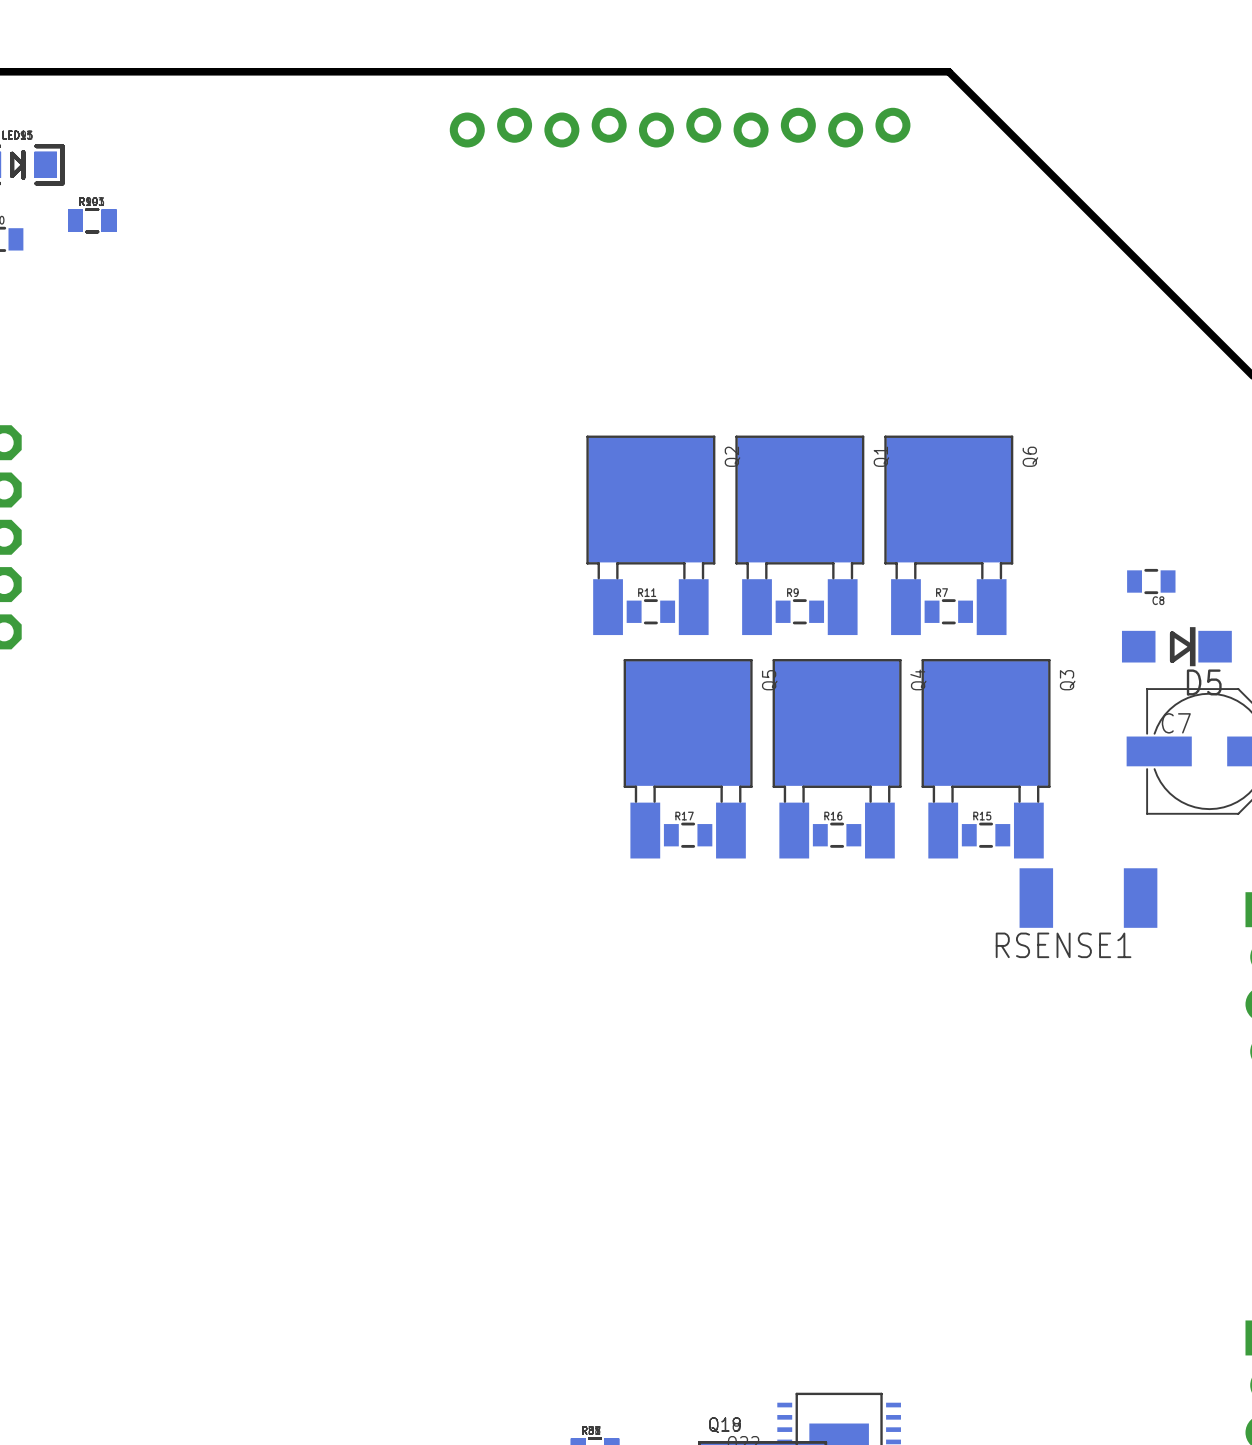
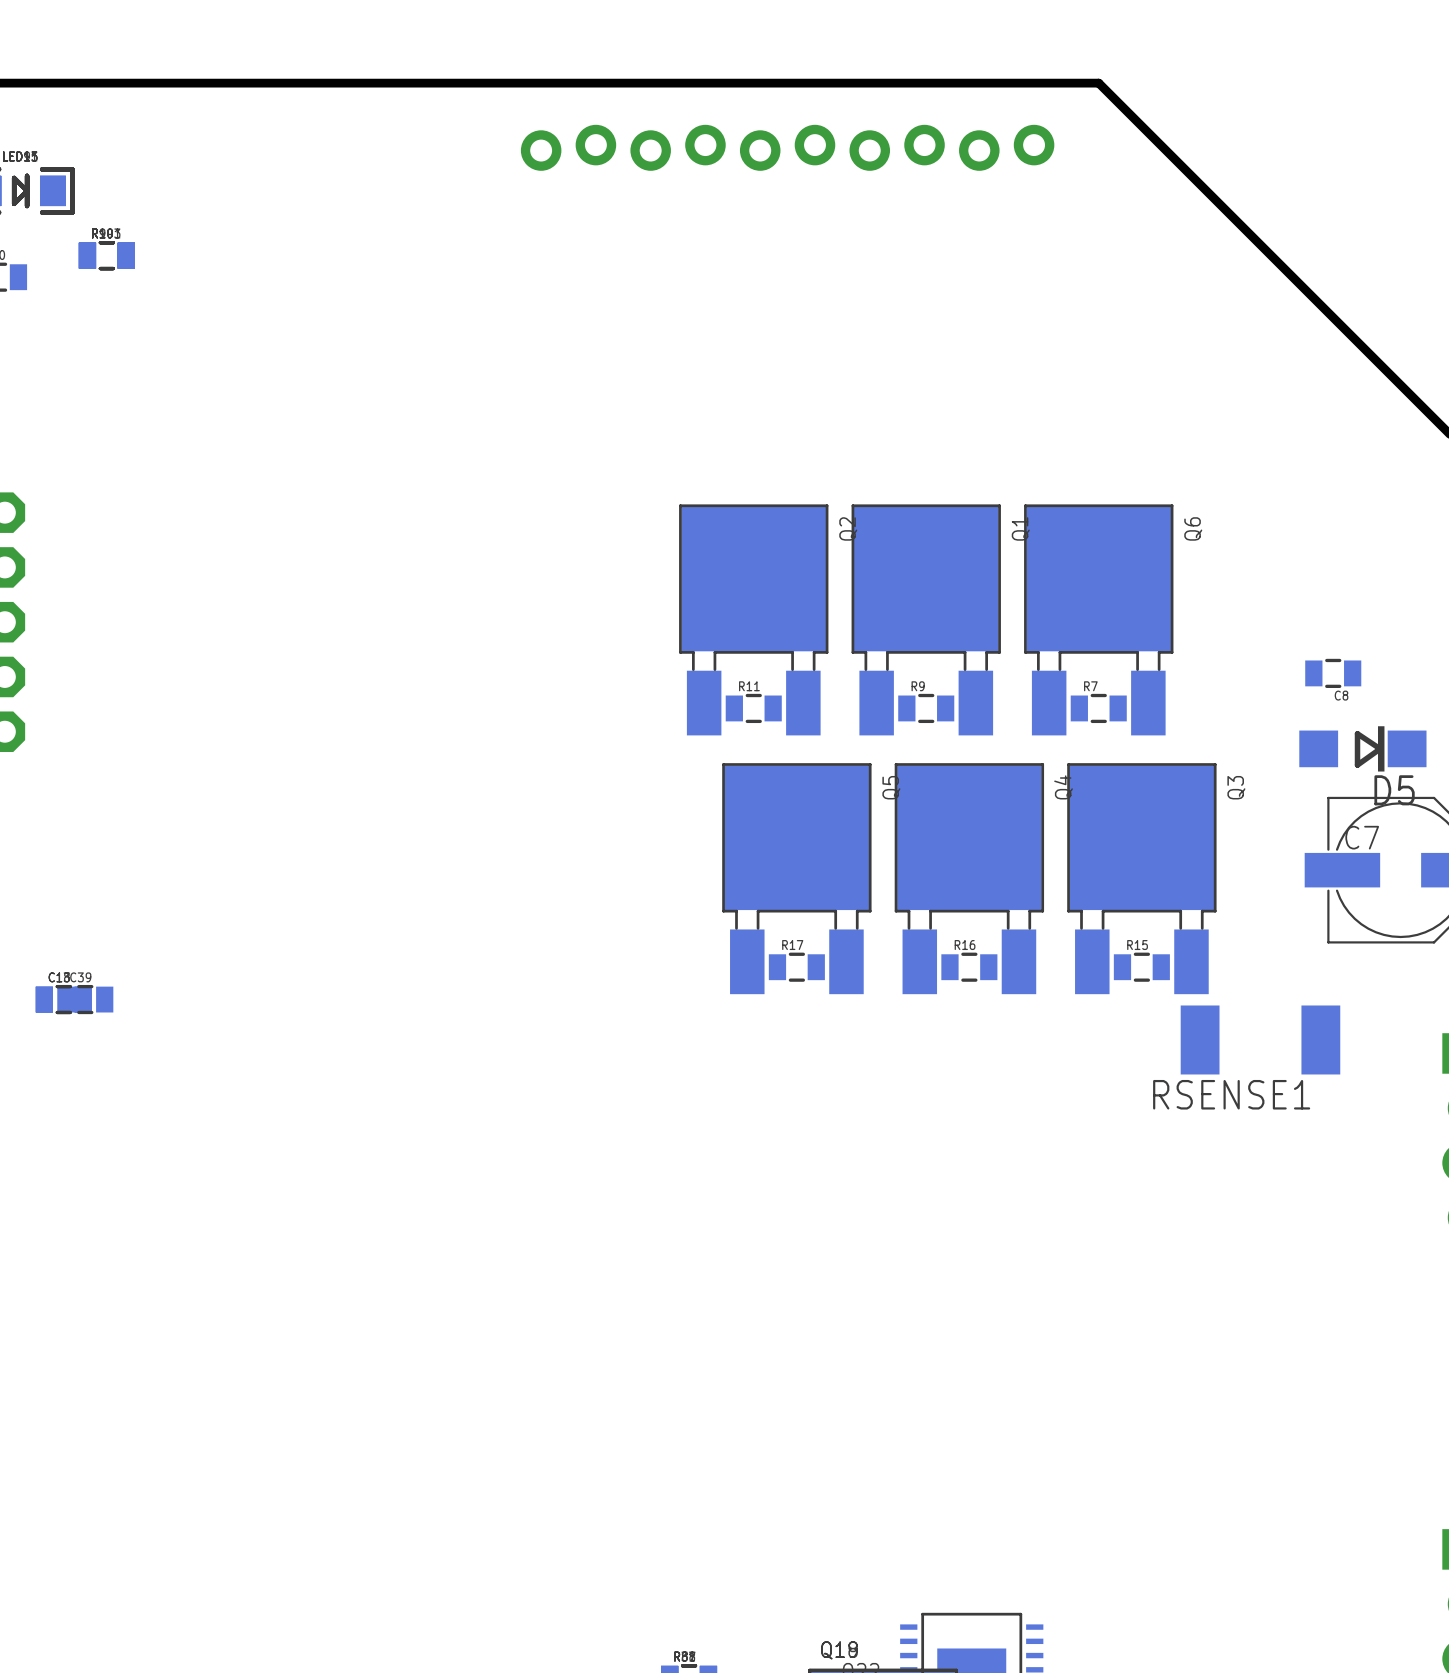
part: none -> (63, 999)
part: none -> (63, 999)
C39: none -> (85, 999)

